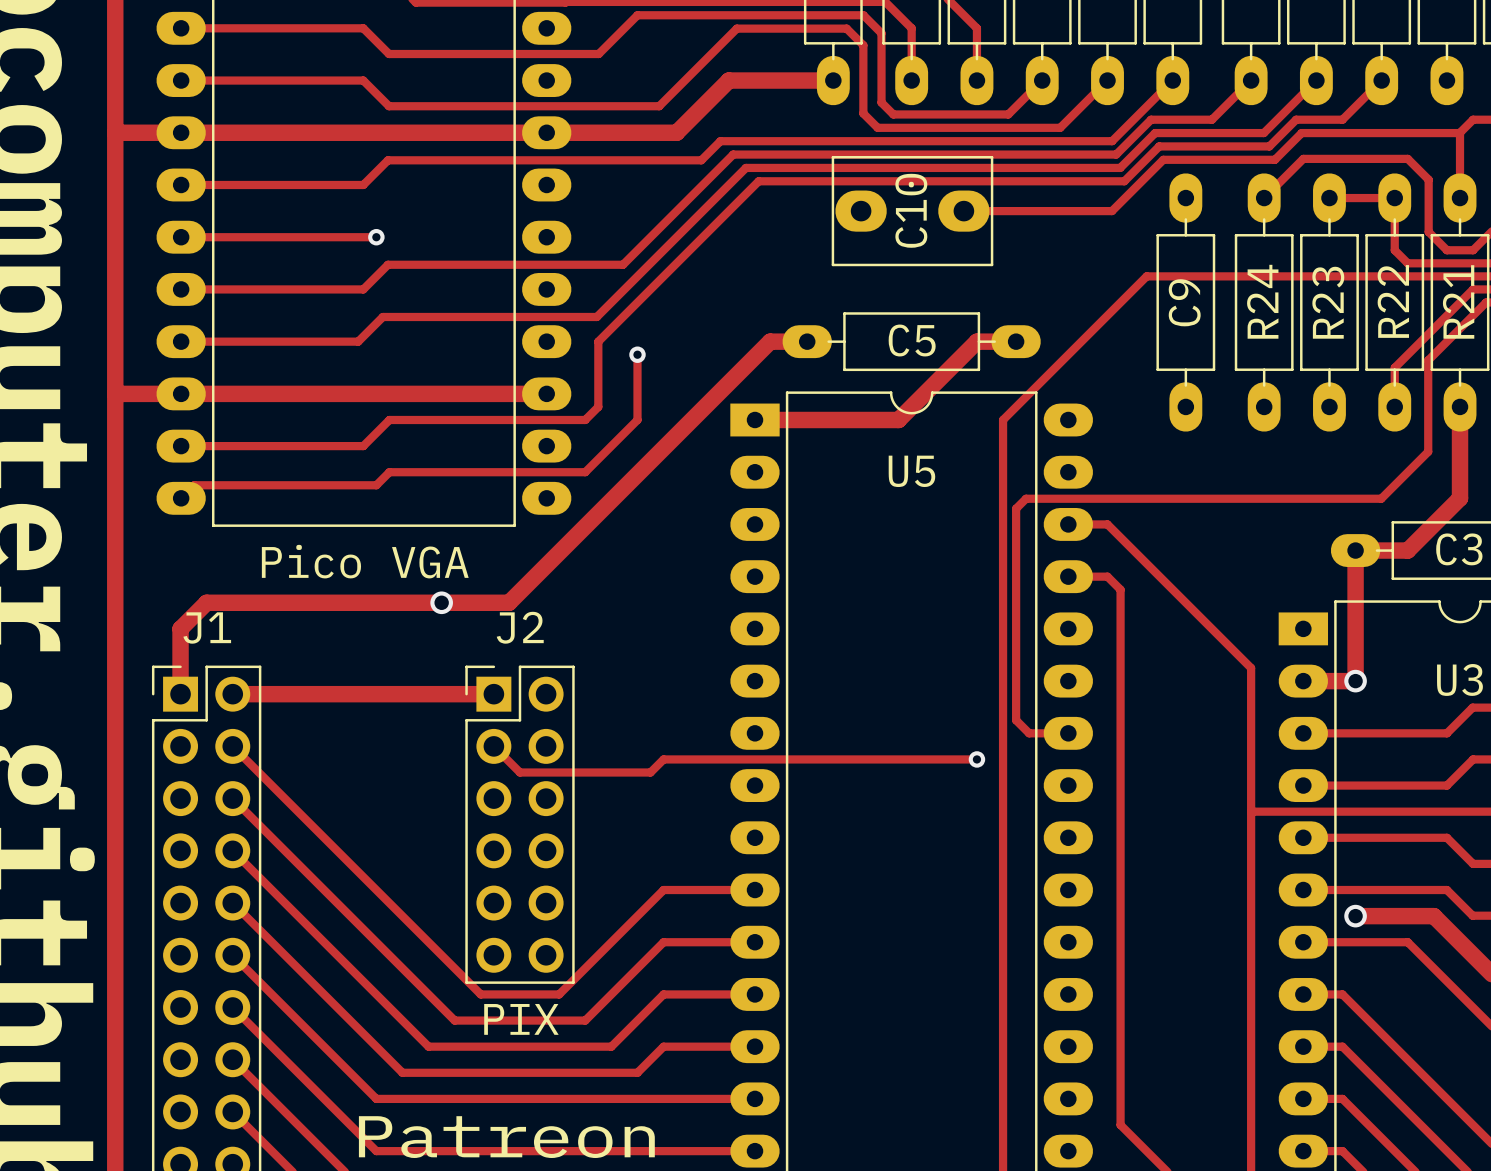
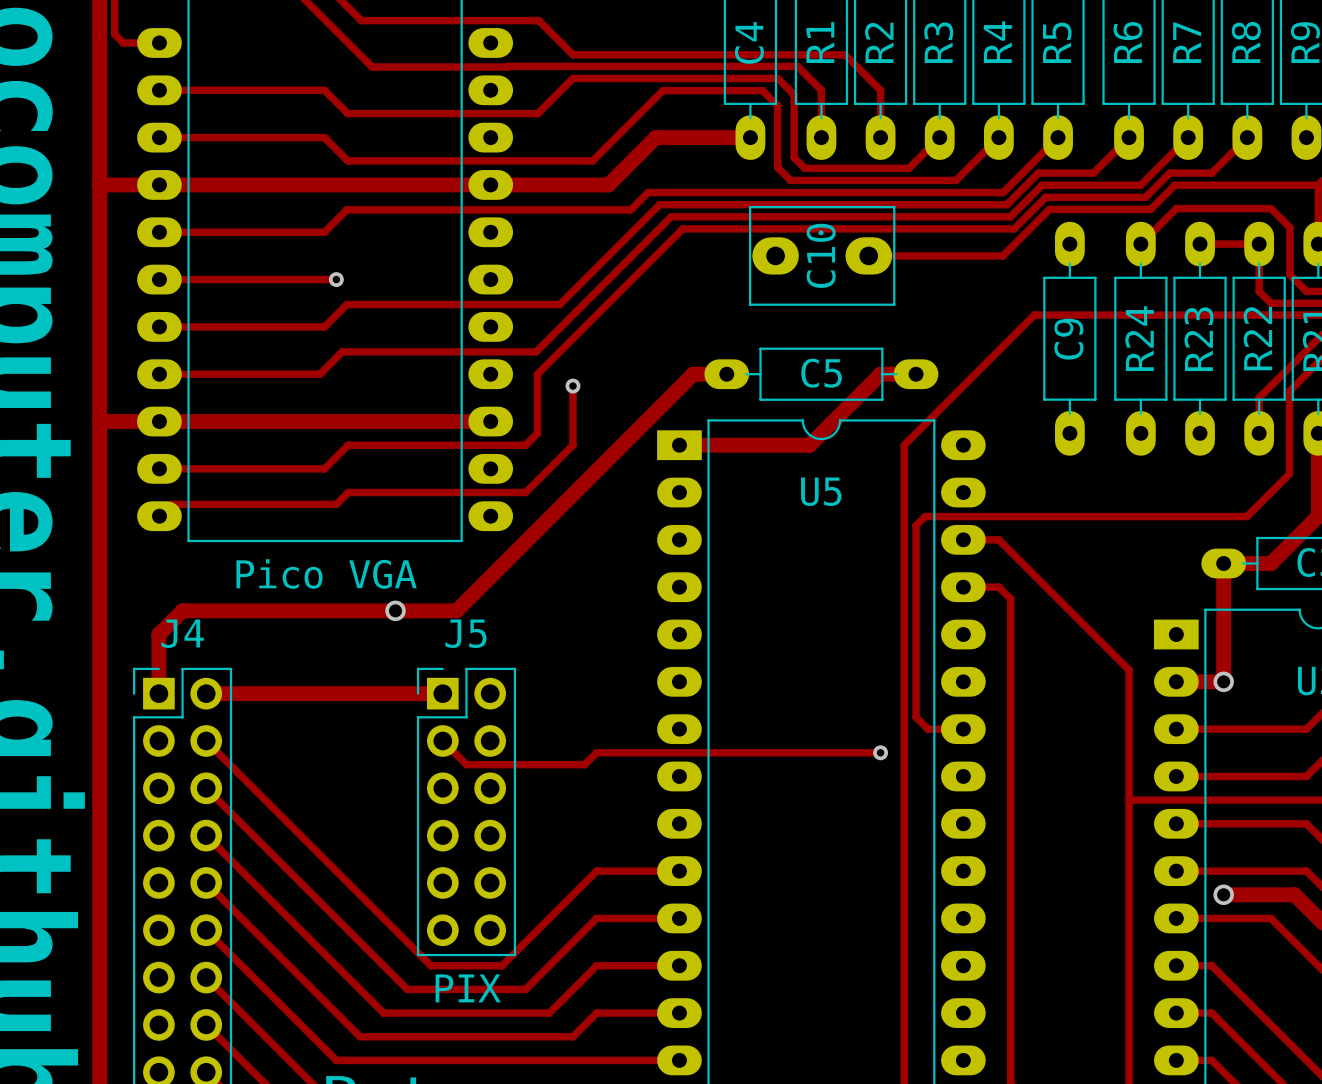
J2 name: J2 (520, 627) -> J5 (465, 633)
J1 name: J1 (207, 628) -> J4 (182, 633)

